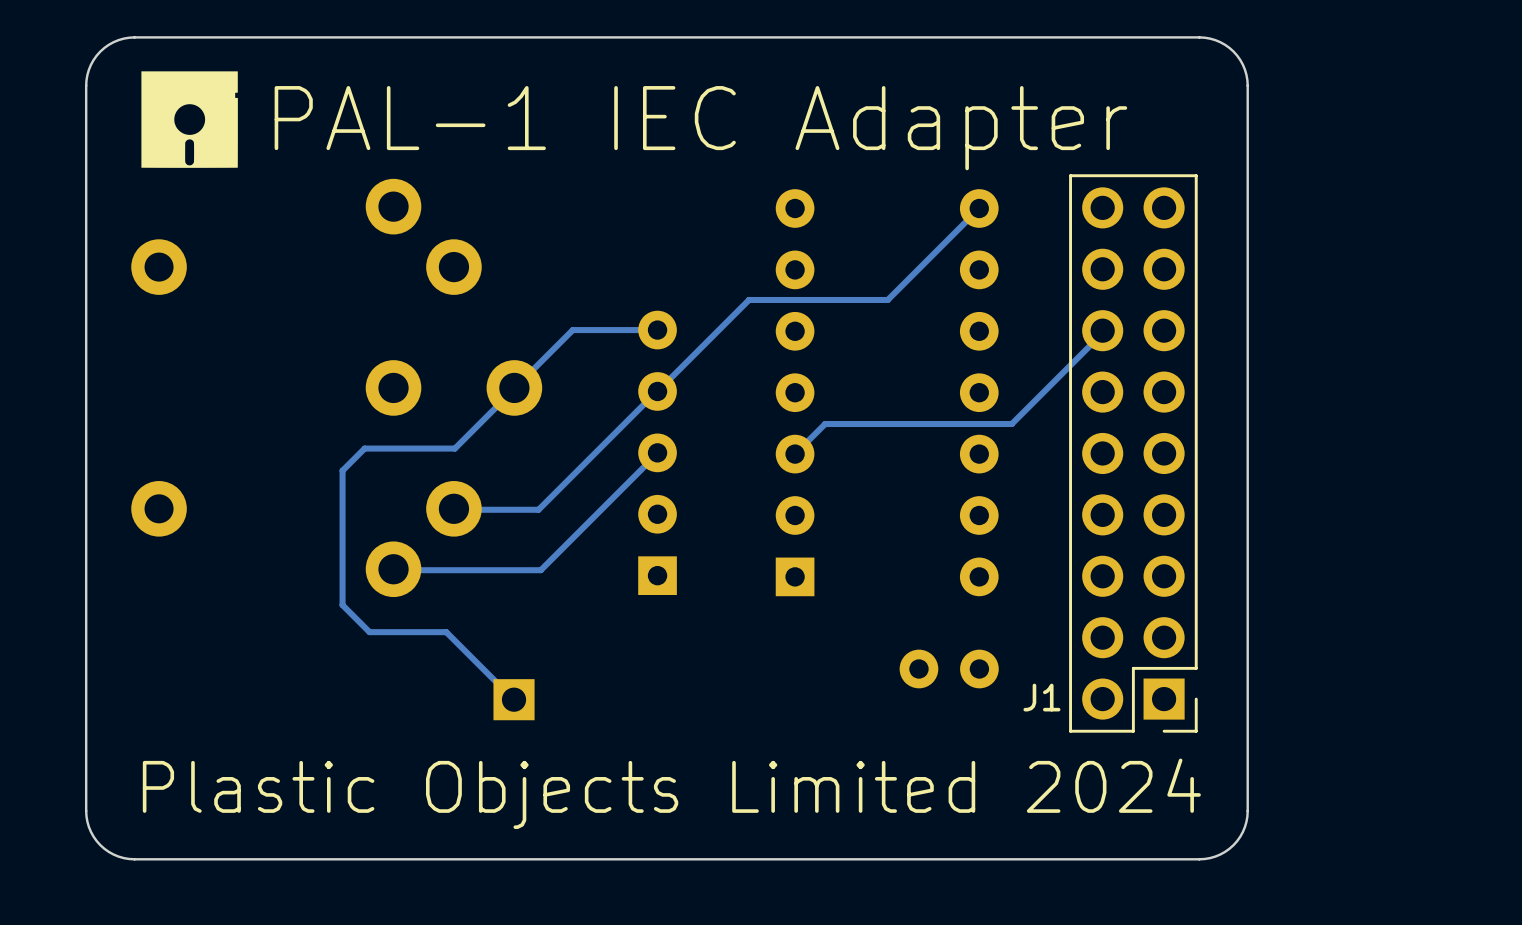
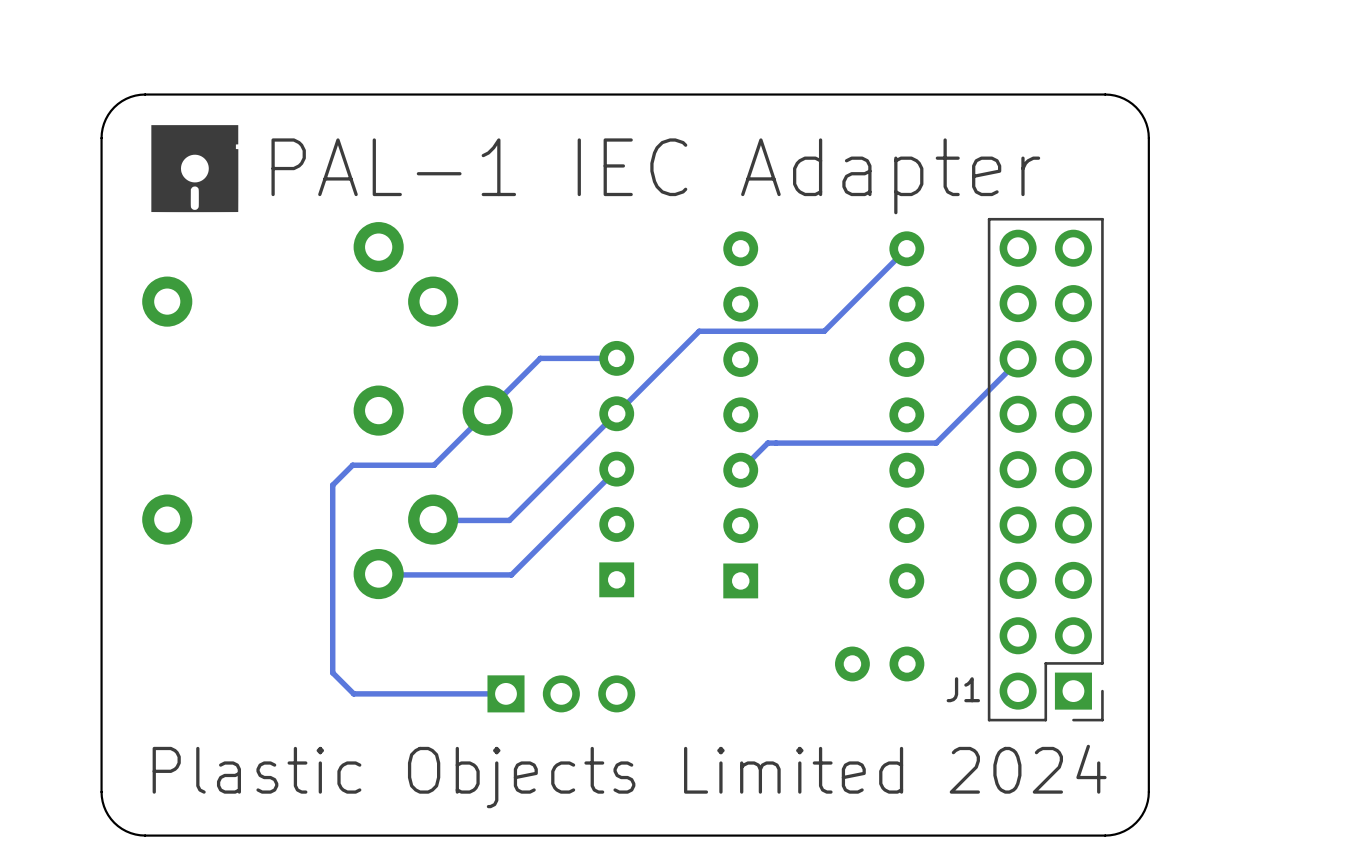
track: (342, 605) (369, 632) (446, 632) (513, 699) -> (332, 606) (332, 672) (353, 693) (506, 693)
part: (514, 699) -> none
part: none -> (561, 693)

